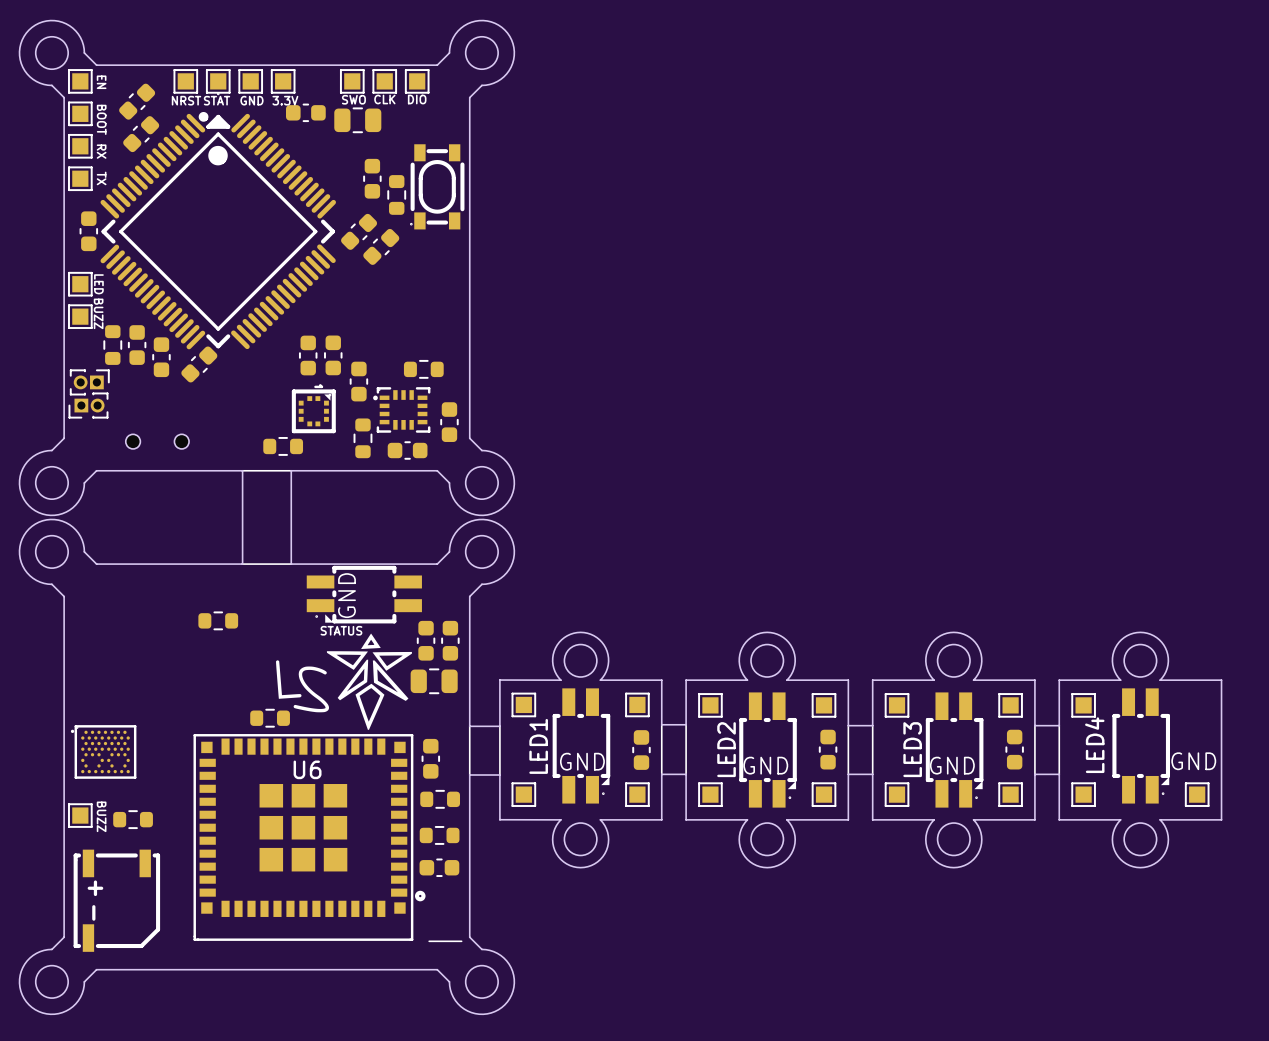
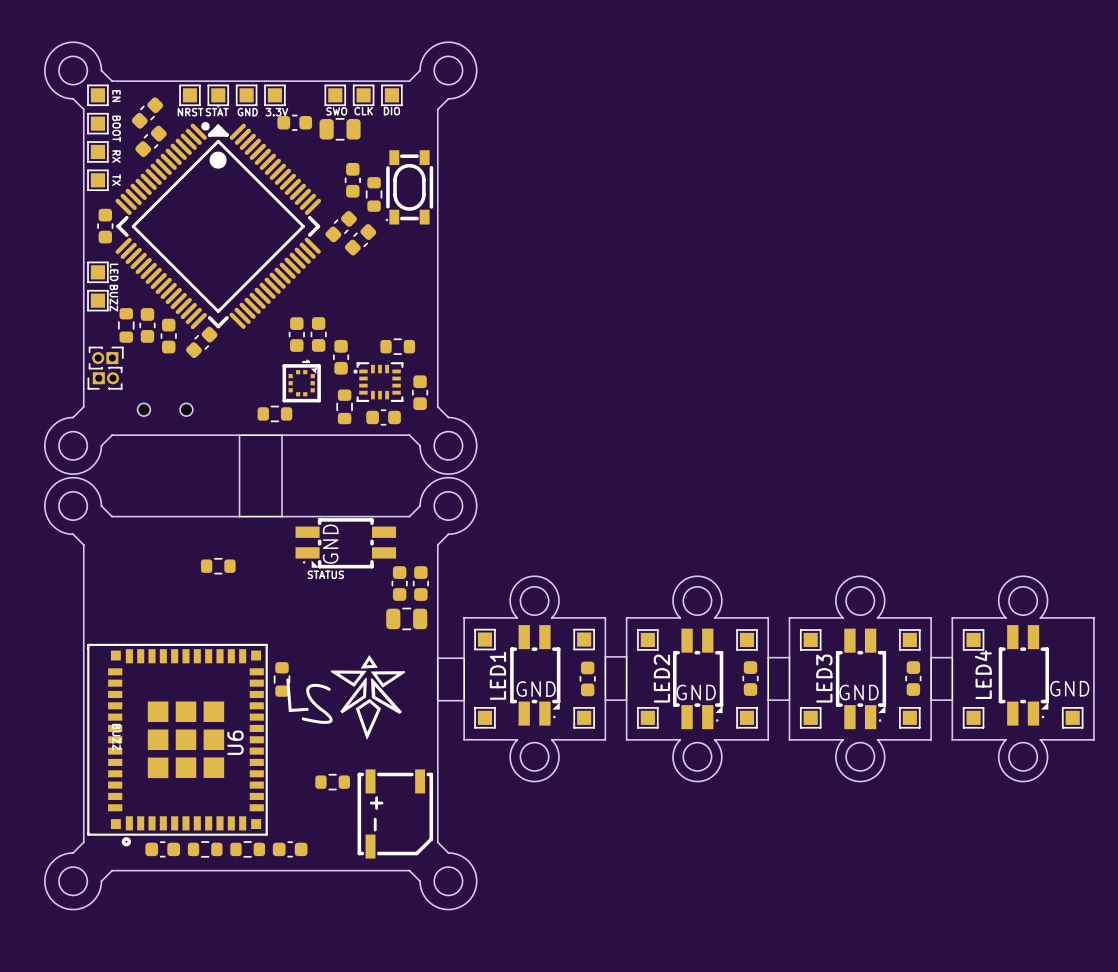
drawing position: (343, 681) -> (345, 697)
part rotation: 0° (270, 718) -> 90° clockwise (282, 679)
part position: (270, 718) -> (282, 679)
part: (103, 751) -> none
part: (430, 758) -> none
part: (440, 799) -> none
part: (80, 815) -> none
part: (133, 819) -> none
part: (439, 835) -> none
U6 rotation: 0° (309, 837) -> 90° clockwise (177, 745)
part: (439, 867) -> none
part: none -> (332, 782)
part position: (116, 900) -> (395, 813)
line: (429, 941) (461, 941) -> none
part: none -> (162, 849)
part: none -> (205, 849)
part: none -> (247, 849)
part: none -> (290, 849)

